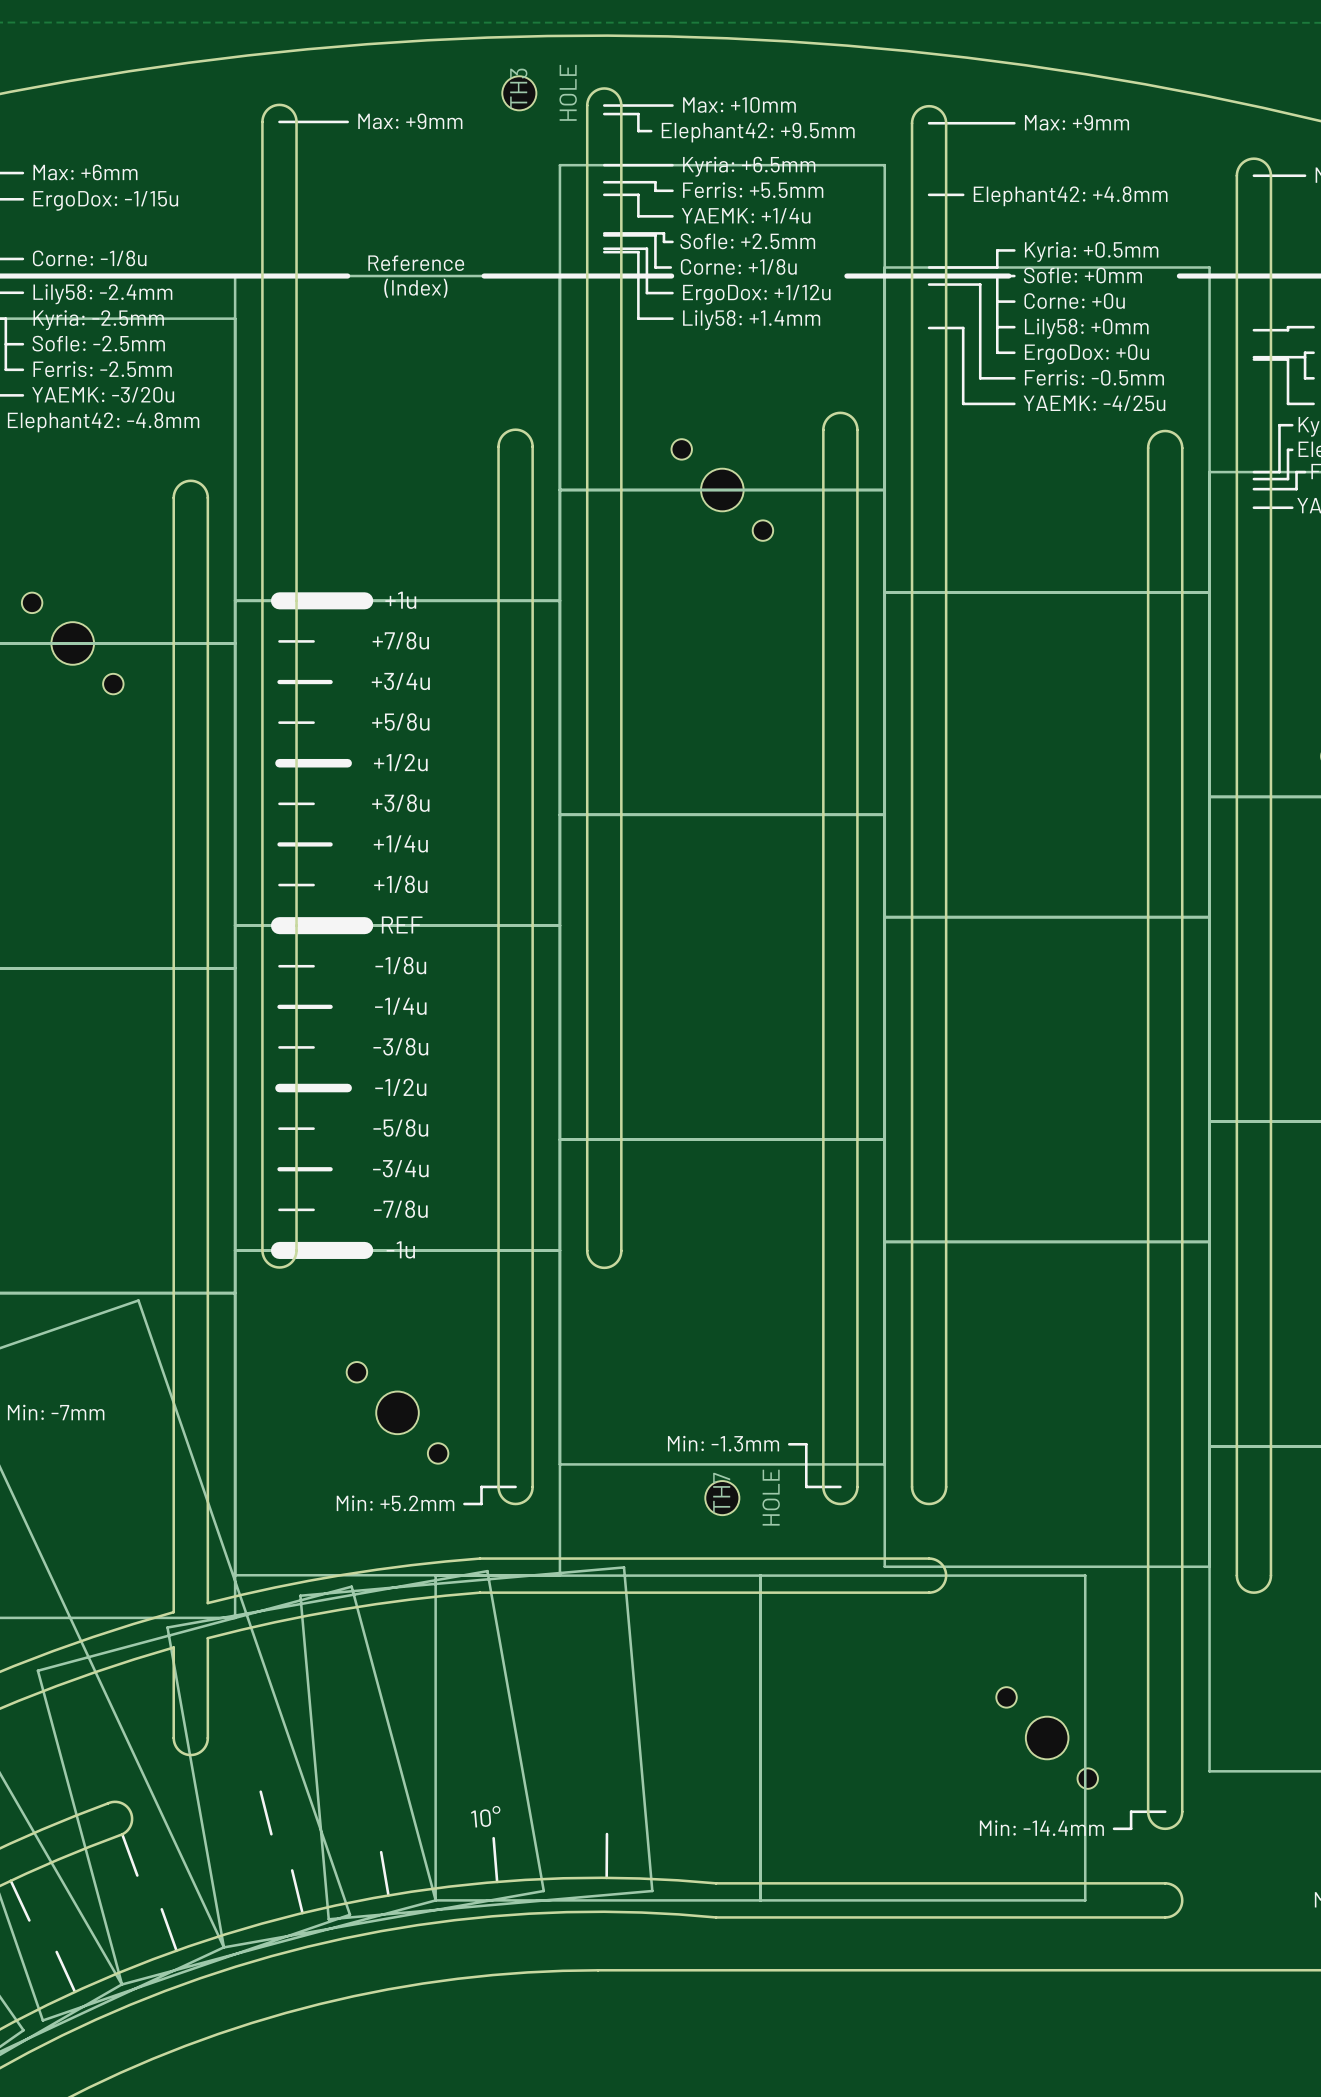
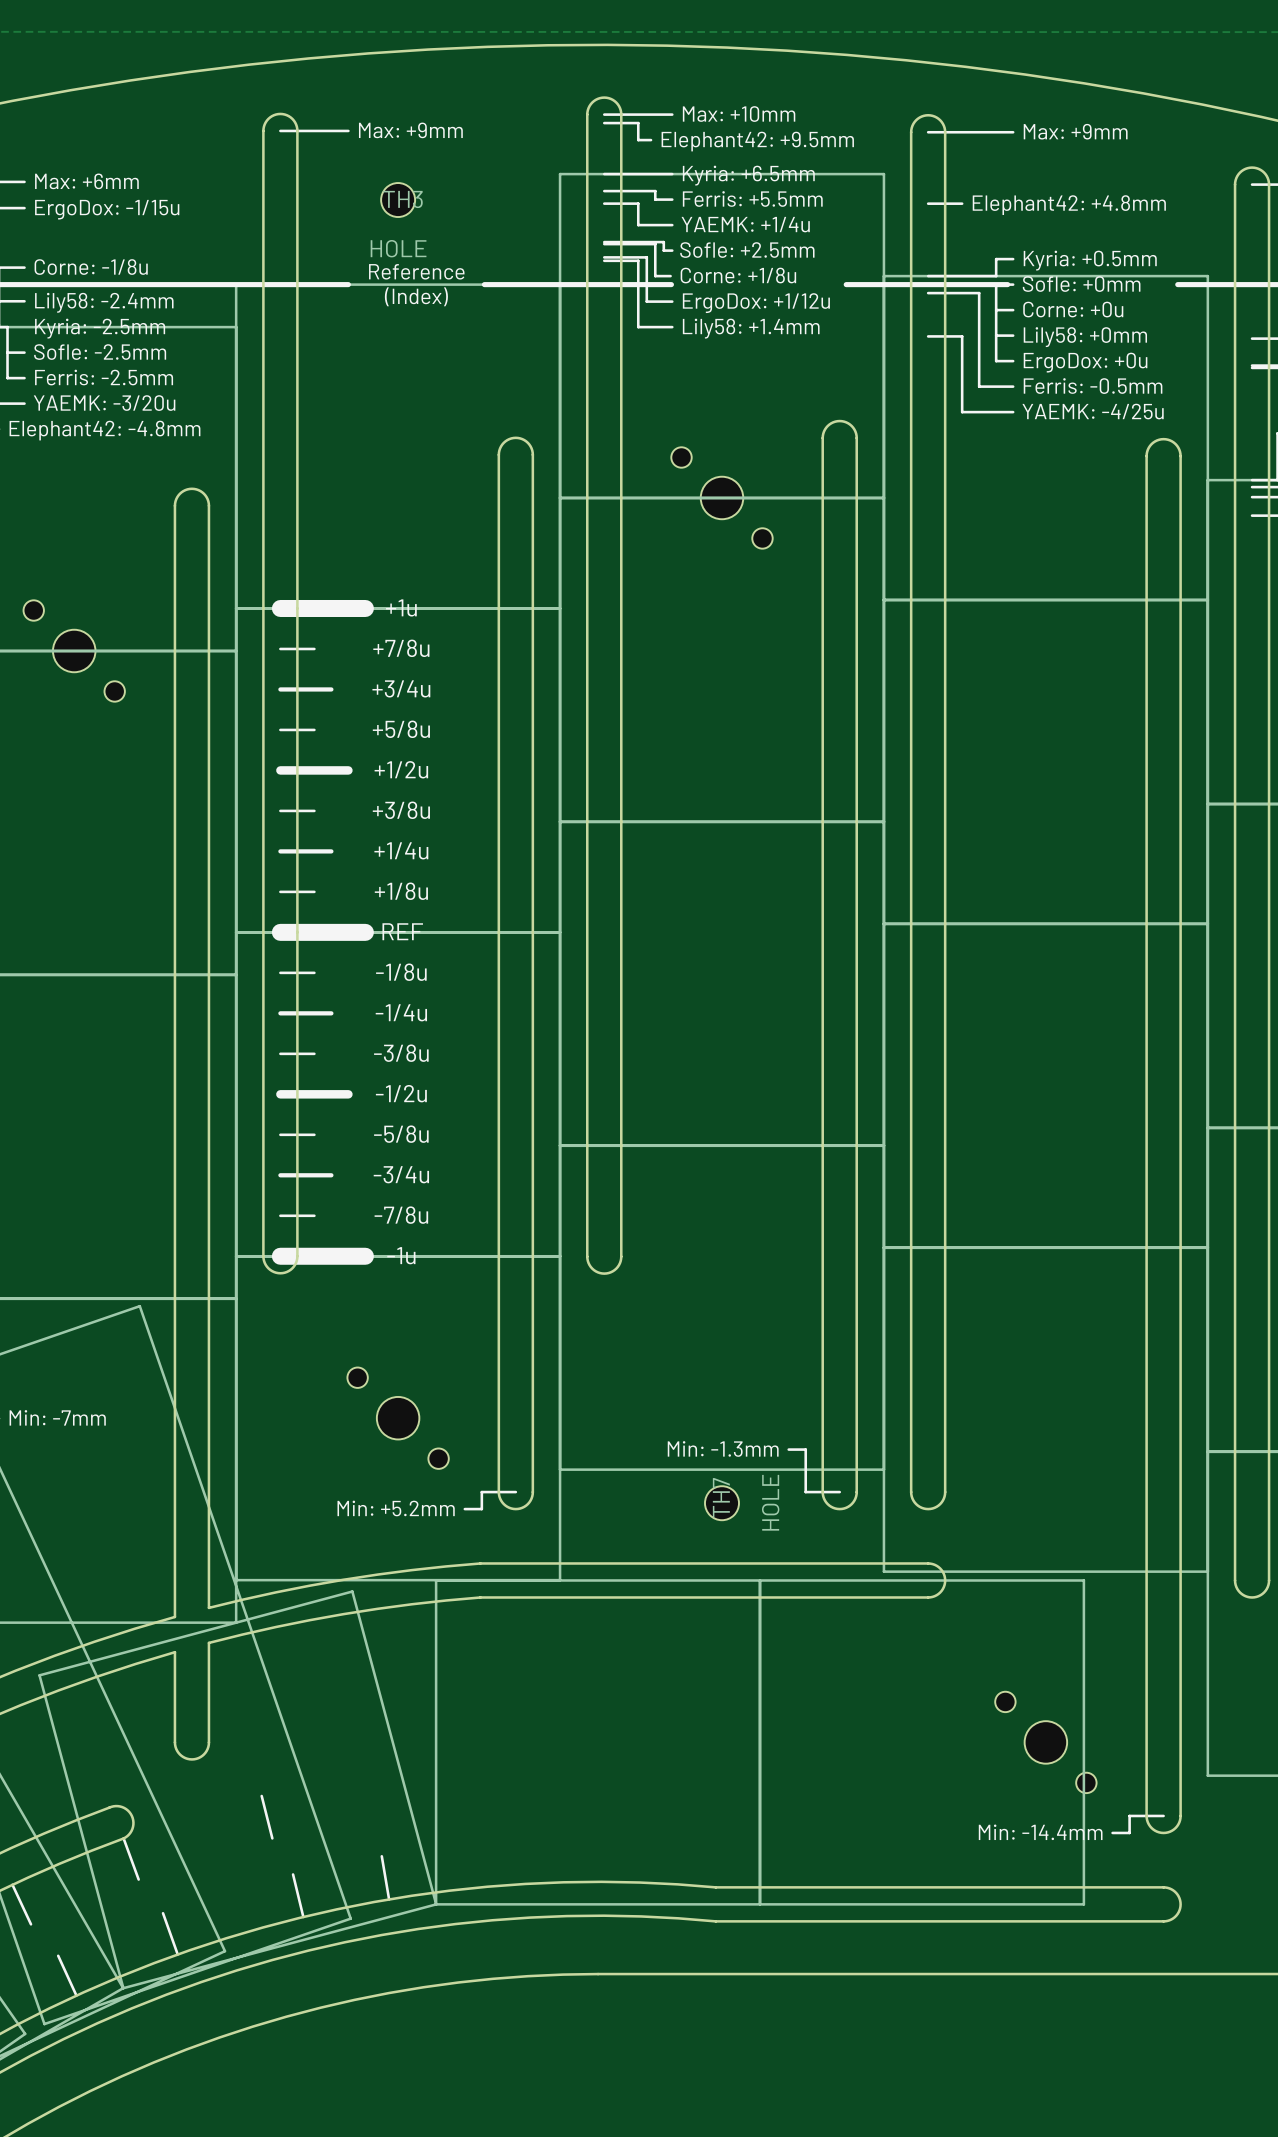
TH3 name rotation: 0° (518, 88) -> 90° clockwise (402, 199)
TH3 value rotation: 0° (568, 92) -> 90° clockwise (398, 248)
TH3 position: (519, 93) -> (398, 200)
drawing: [166, 1566, 654, 1949] -> none

